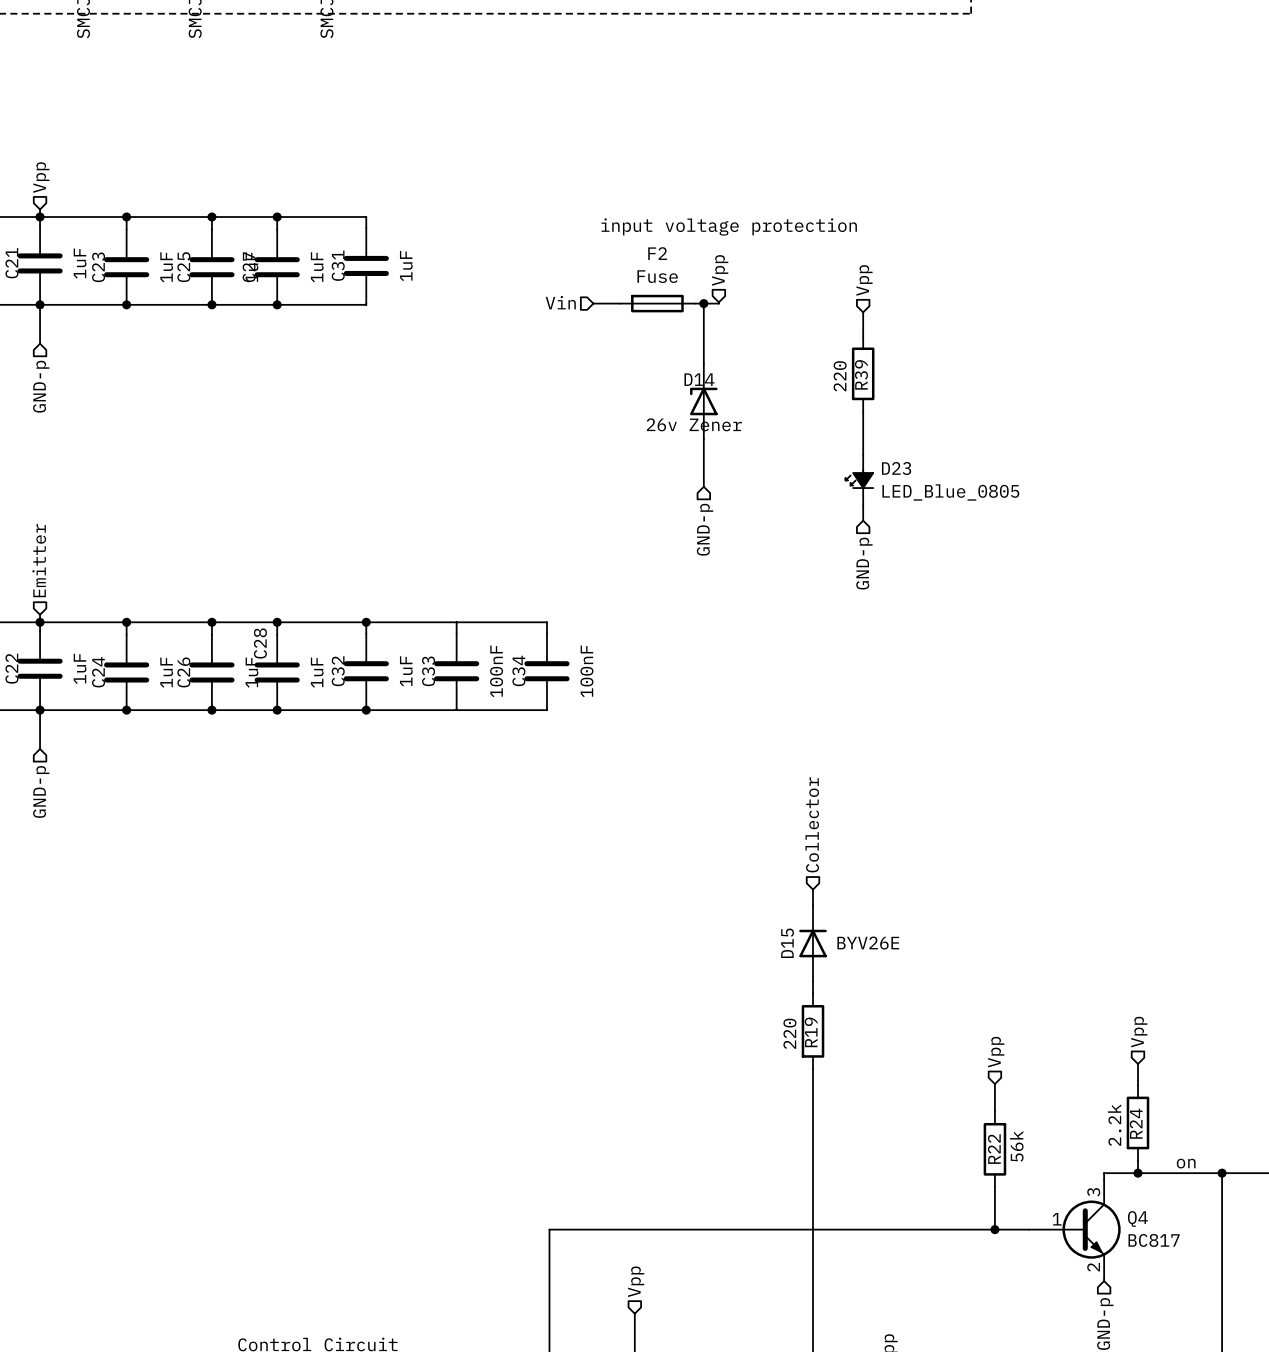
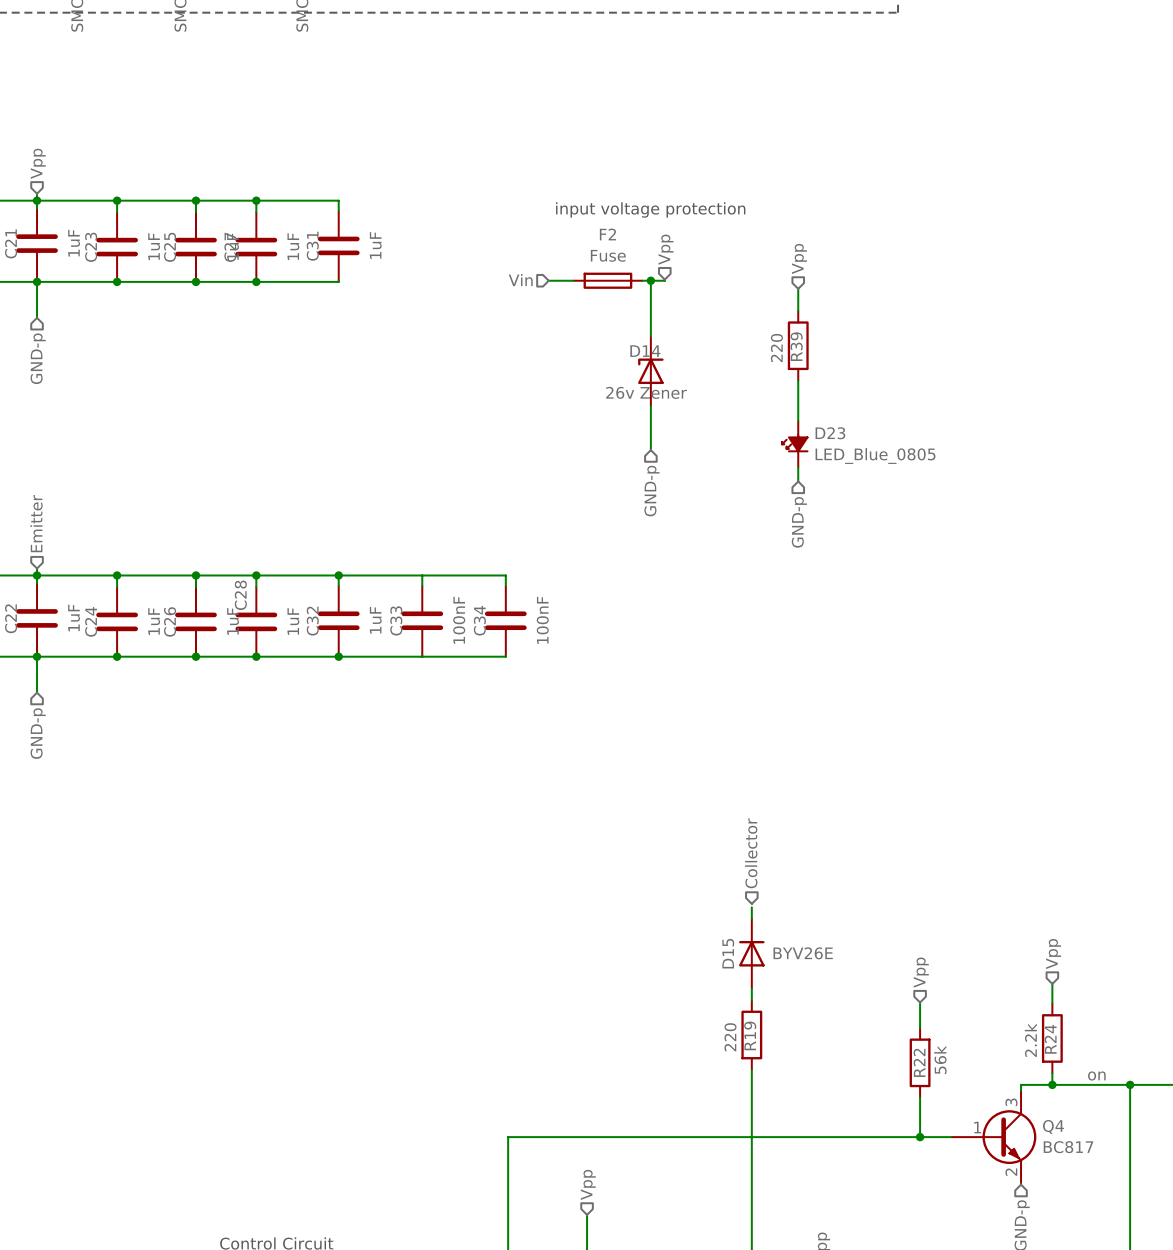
hierarchical label position: Collector (812, 824) -> Collector (751, 853)
wire: (812, 889) (812, 905) -> none
D15 position: (812, 943) -> (751, 953)
R19 position: (812, 1031) -> (751, 1034)
wire: (812, 1081) (812, 1156) -> none

